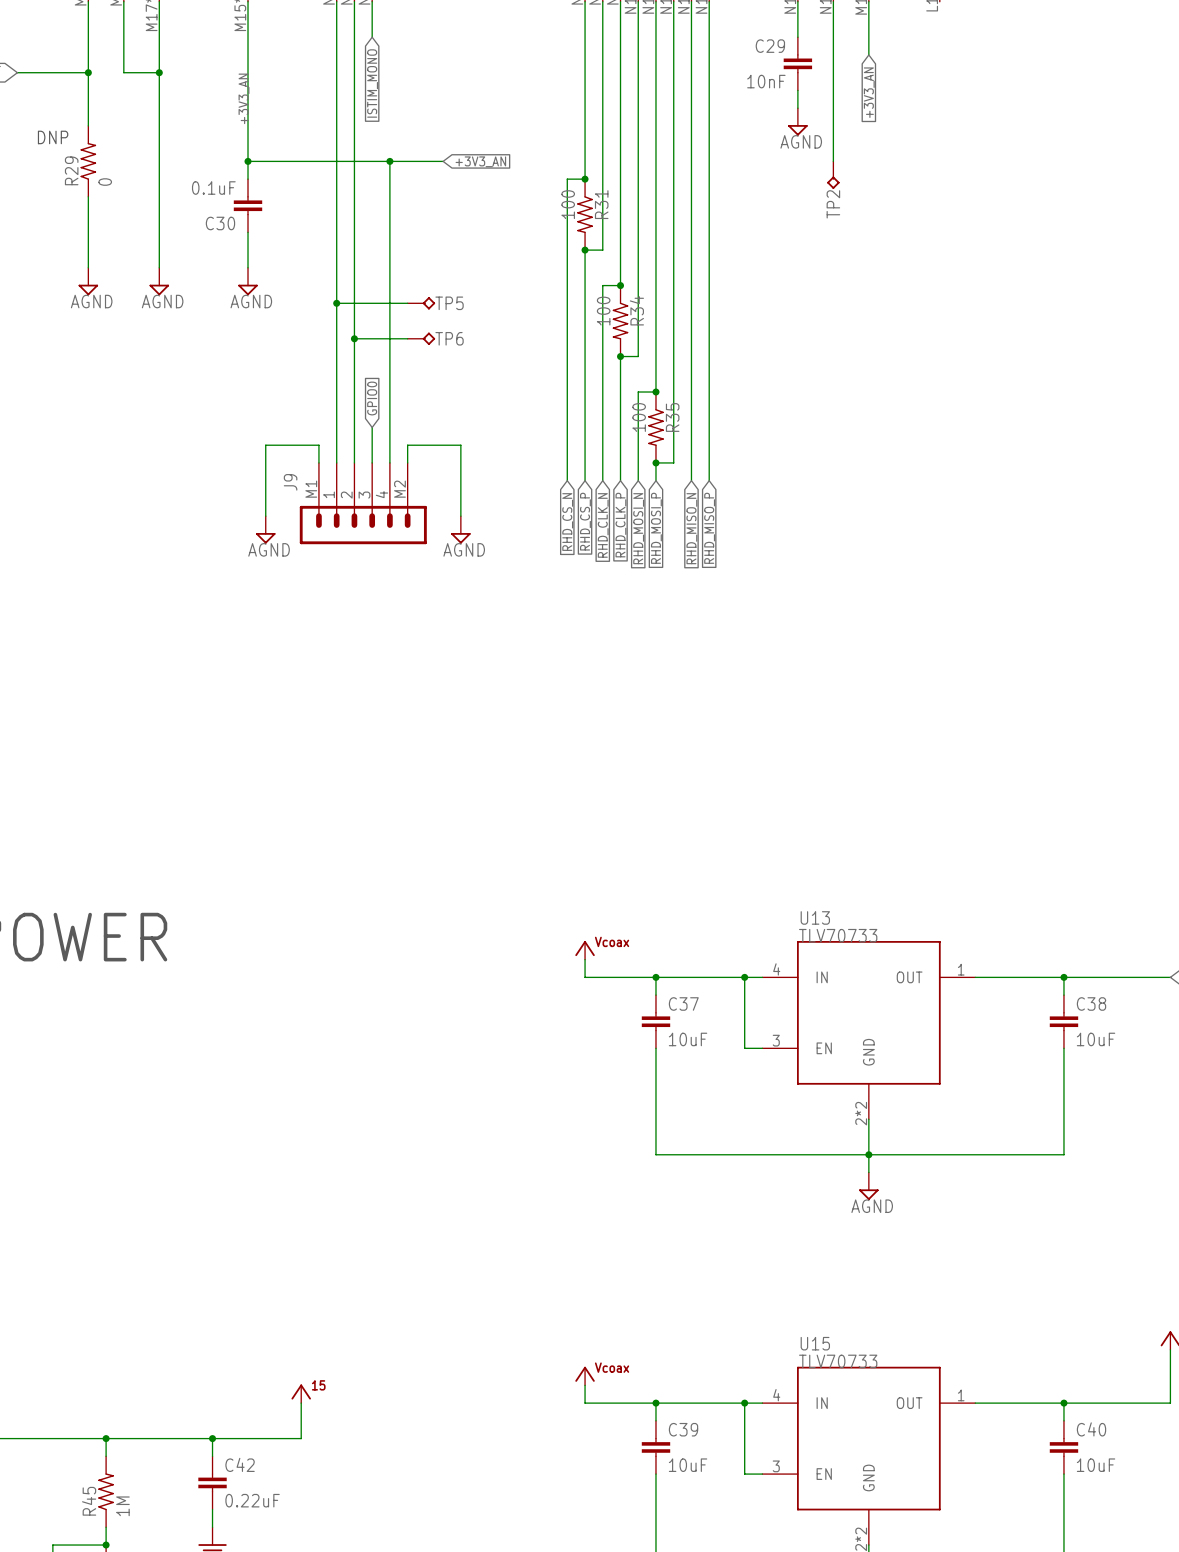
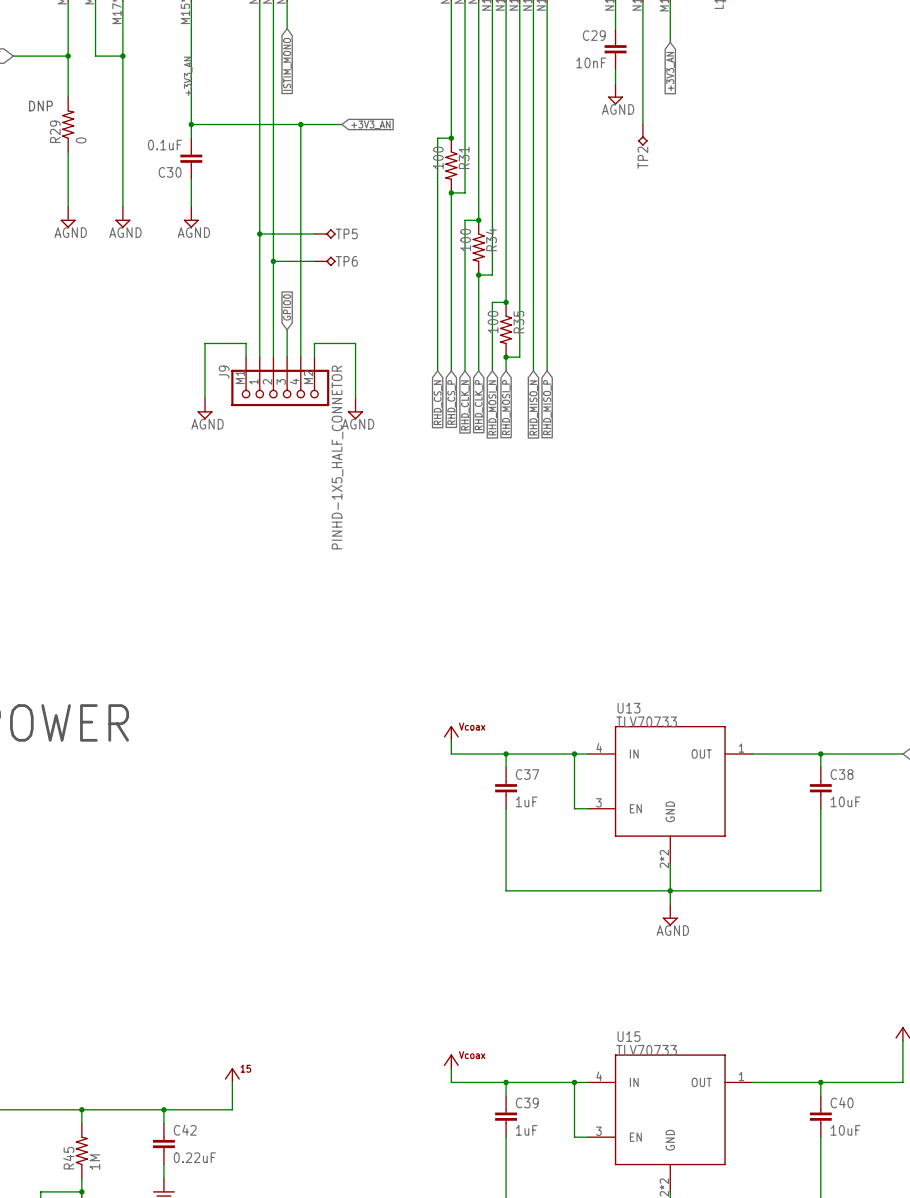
J9 symbol: [299, 462, 427, 545] -> [231, 357, 330, 407]
J9 value: none -> PINHD-1X5_HALF_CONNETOR (337, 457)
C37 value: 10uF (688, 1039) -> 1uF (526, 801)
C39 value: 10uF (688, 1465) -> 1uF (526, 1130)

